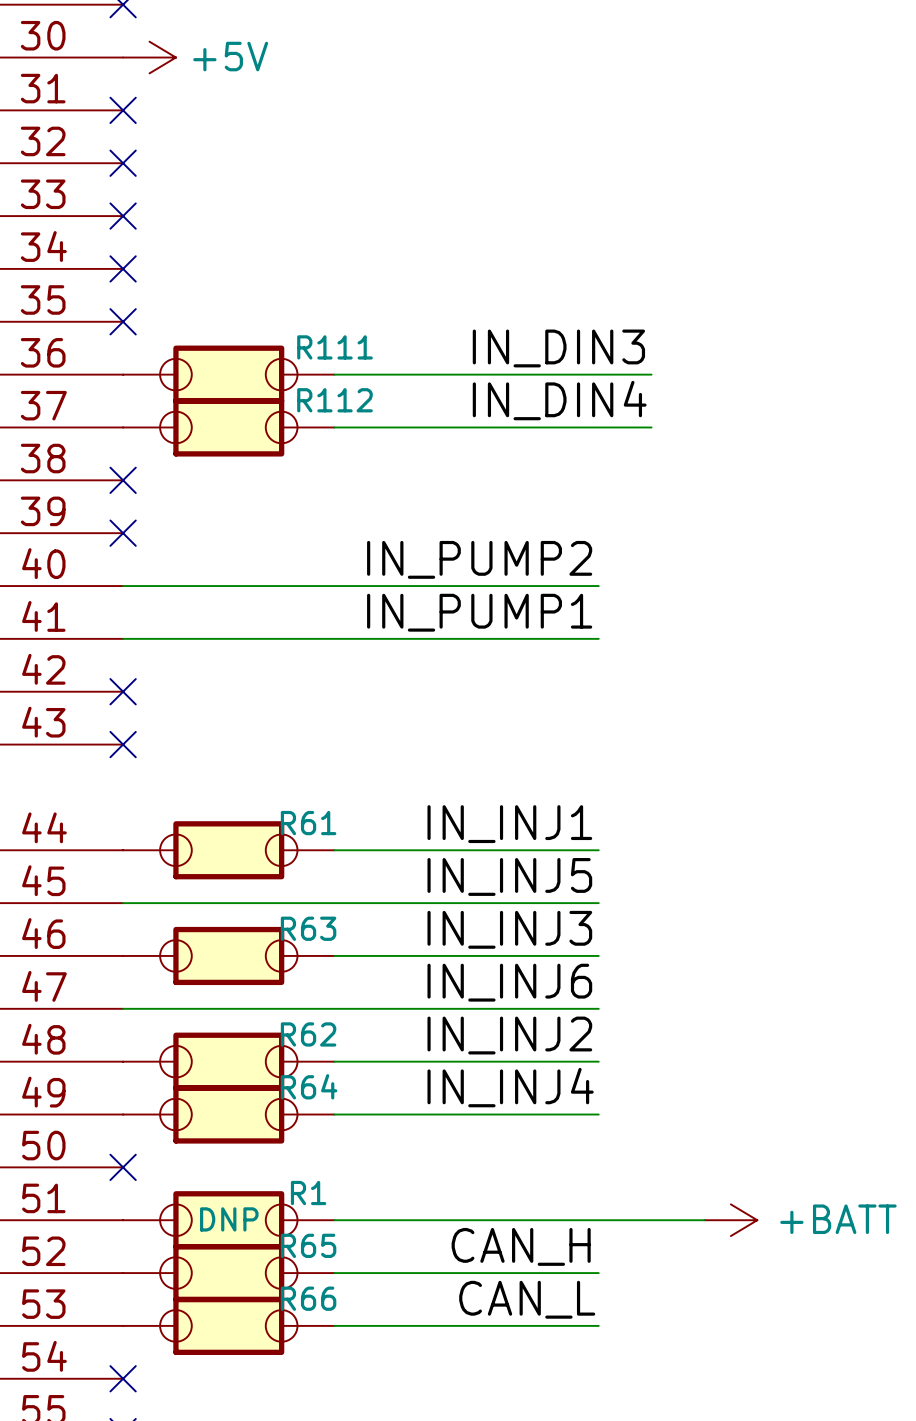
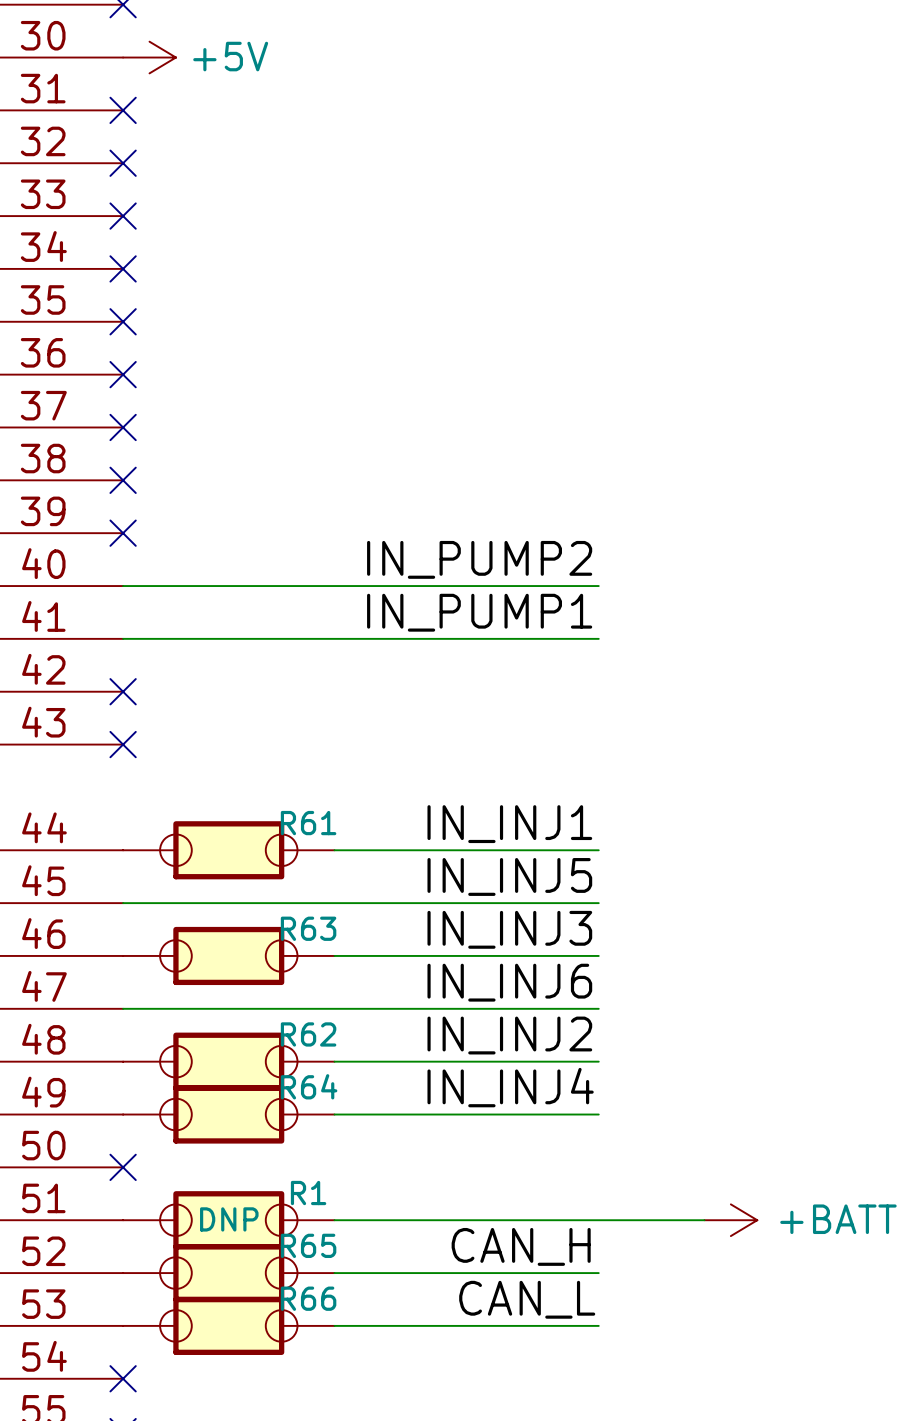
label: IN_DIN3 (558, 348) -> none
no-connect mark: none -> (123, 374)
R111: (228, 374) -> none
wire: (334, 374) (651, 374) -> none
label: IN_DIN4 (559, 400) -> none
no-connect mark: none -> (123, 427)
R112: (228, 427) -> none
wire: (334, 427) (651, 427) -> none

